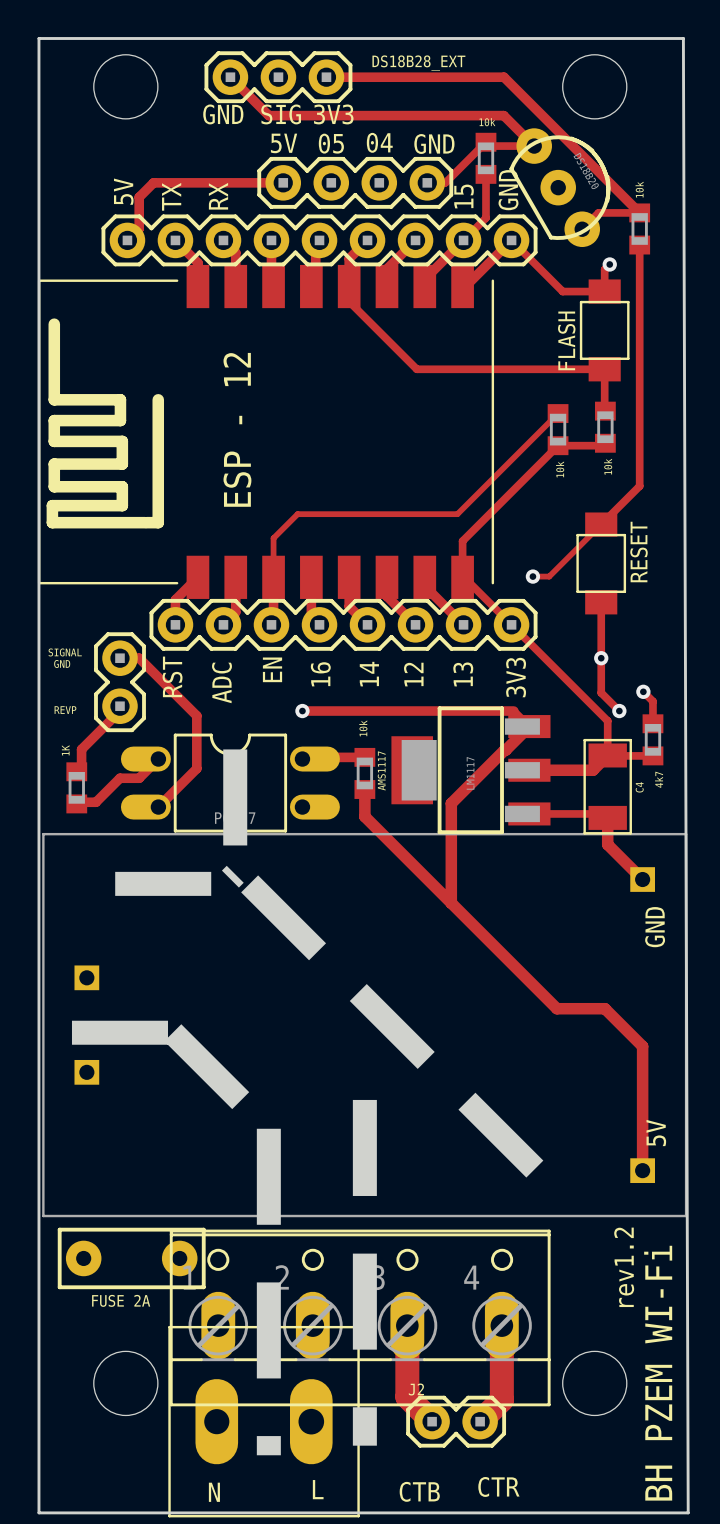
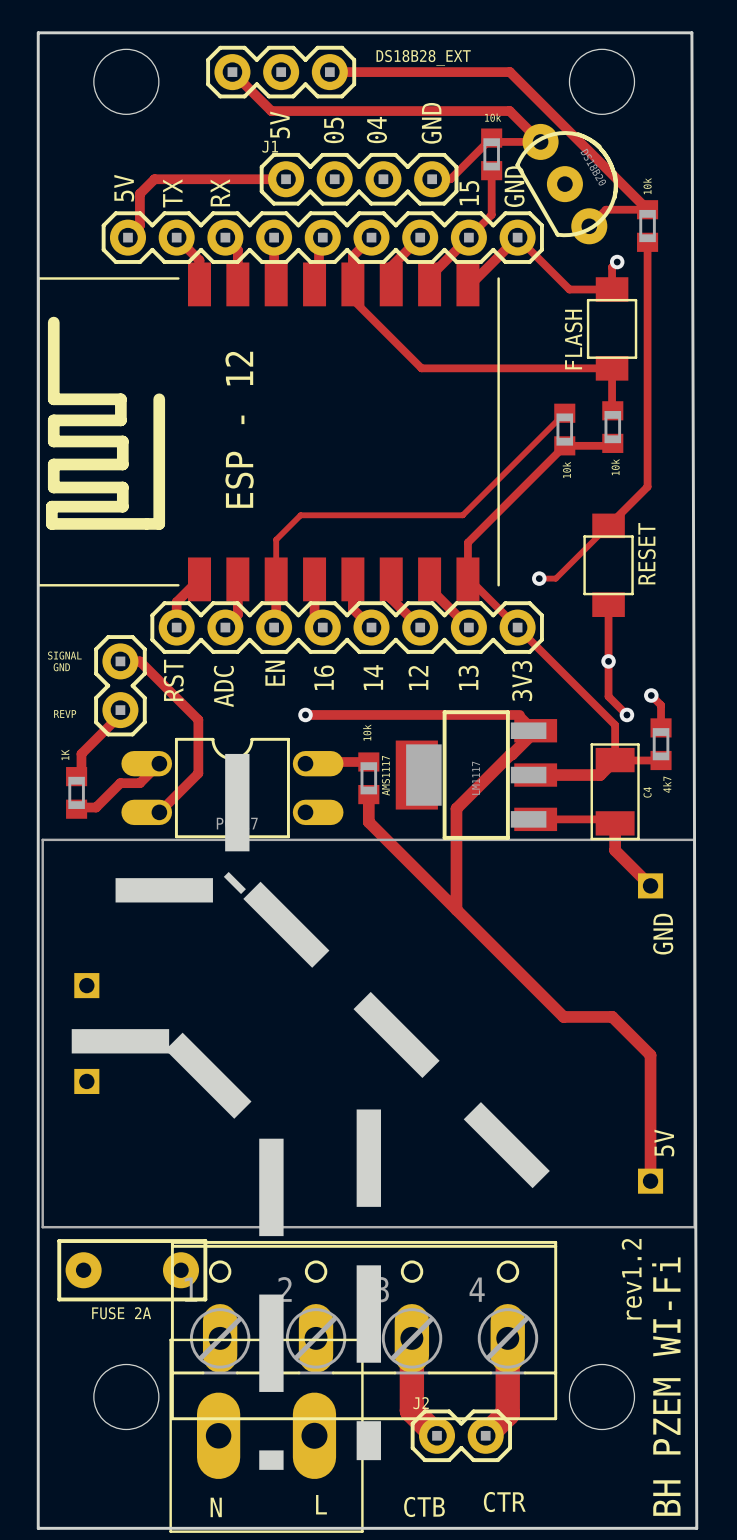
text: GND (223, 114) -> none
text: SIG (281, 114) -> none
text: 3V3 (333, 114) -> none
text rotation: 0° (379, 142) -> 90° counterclockwise (376, 130)
text rotation: 0° (284, 143) -> 90° counterclockwise (280, 124)
text rotation: 0° (331, 143) -> 90° counterclockwise (333, 130)
text rotation: 0° (434, 144) -> 90° counterclockwise (431, 123)
J1 name: none -> J1 (270, 146)

